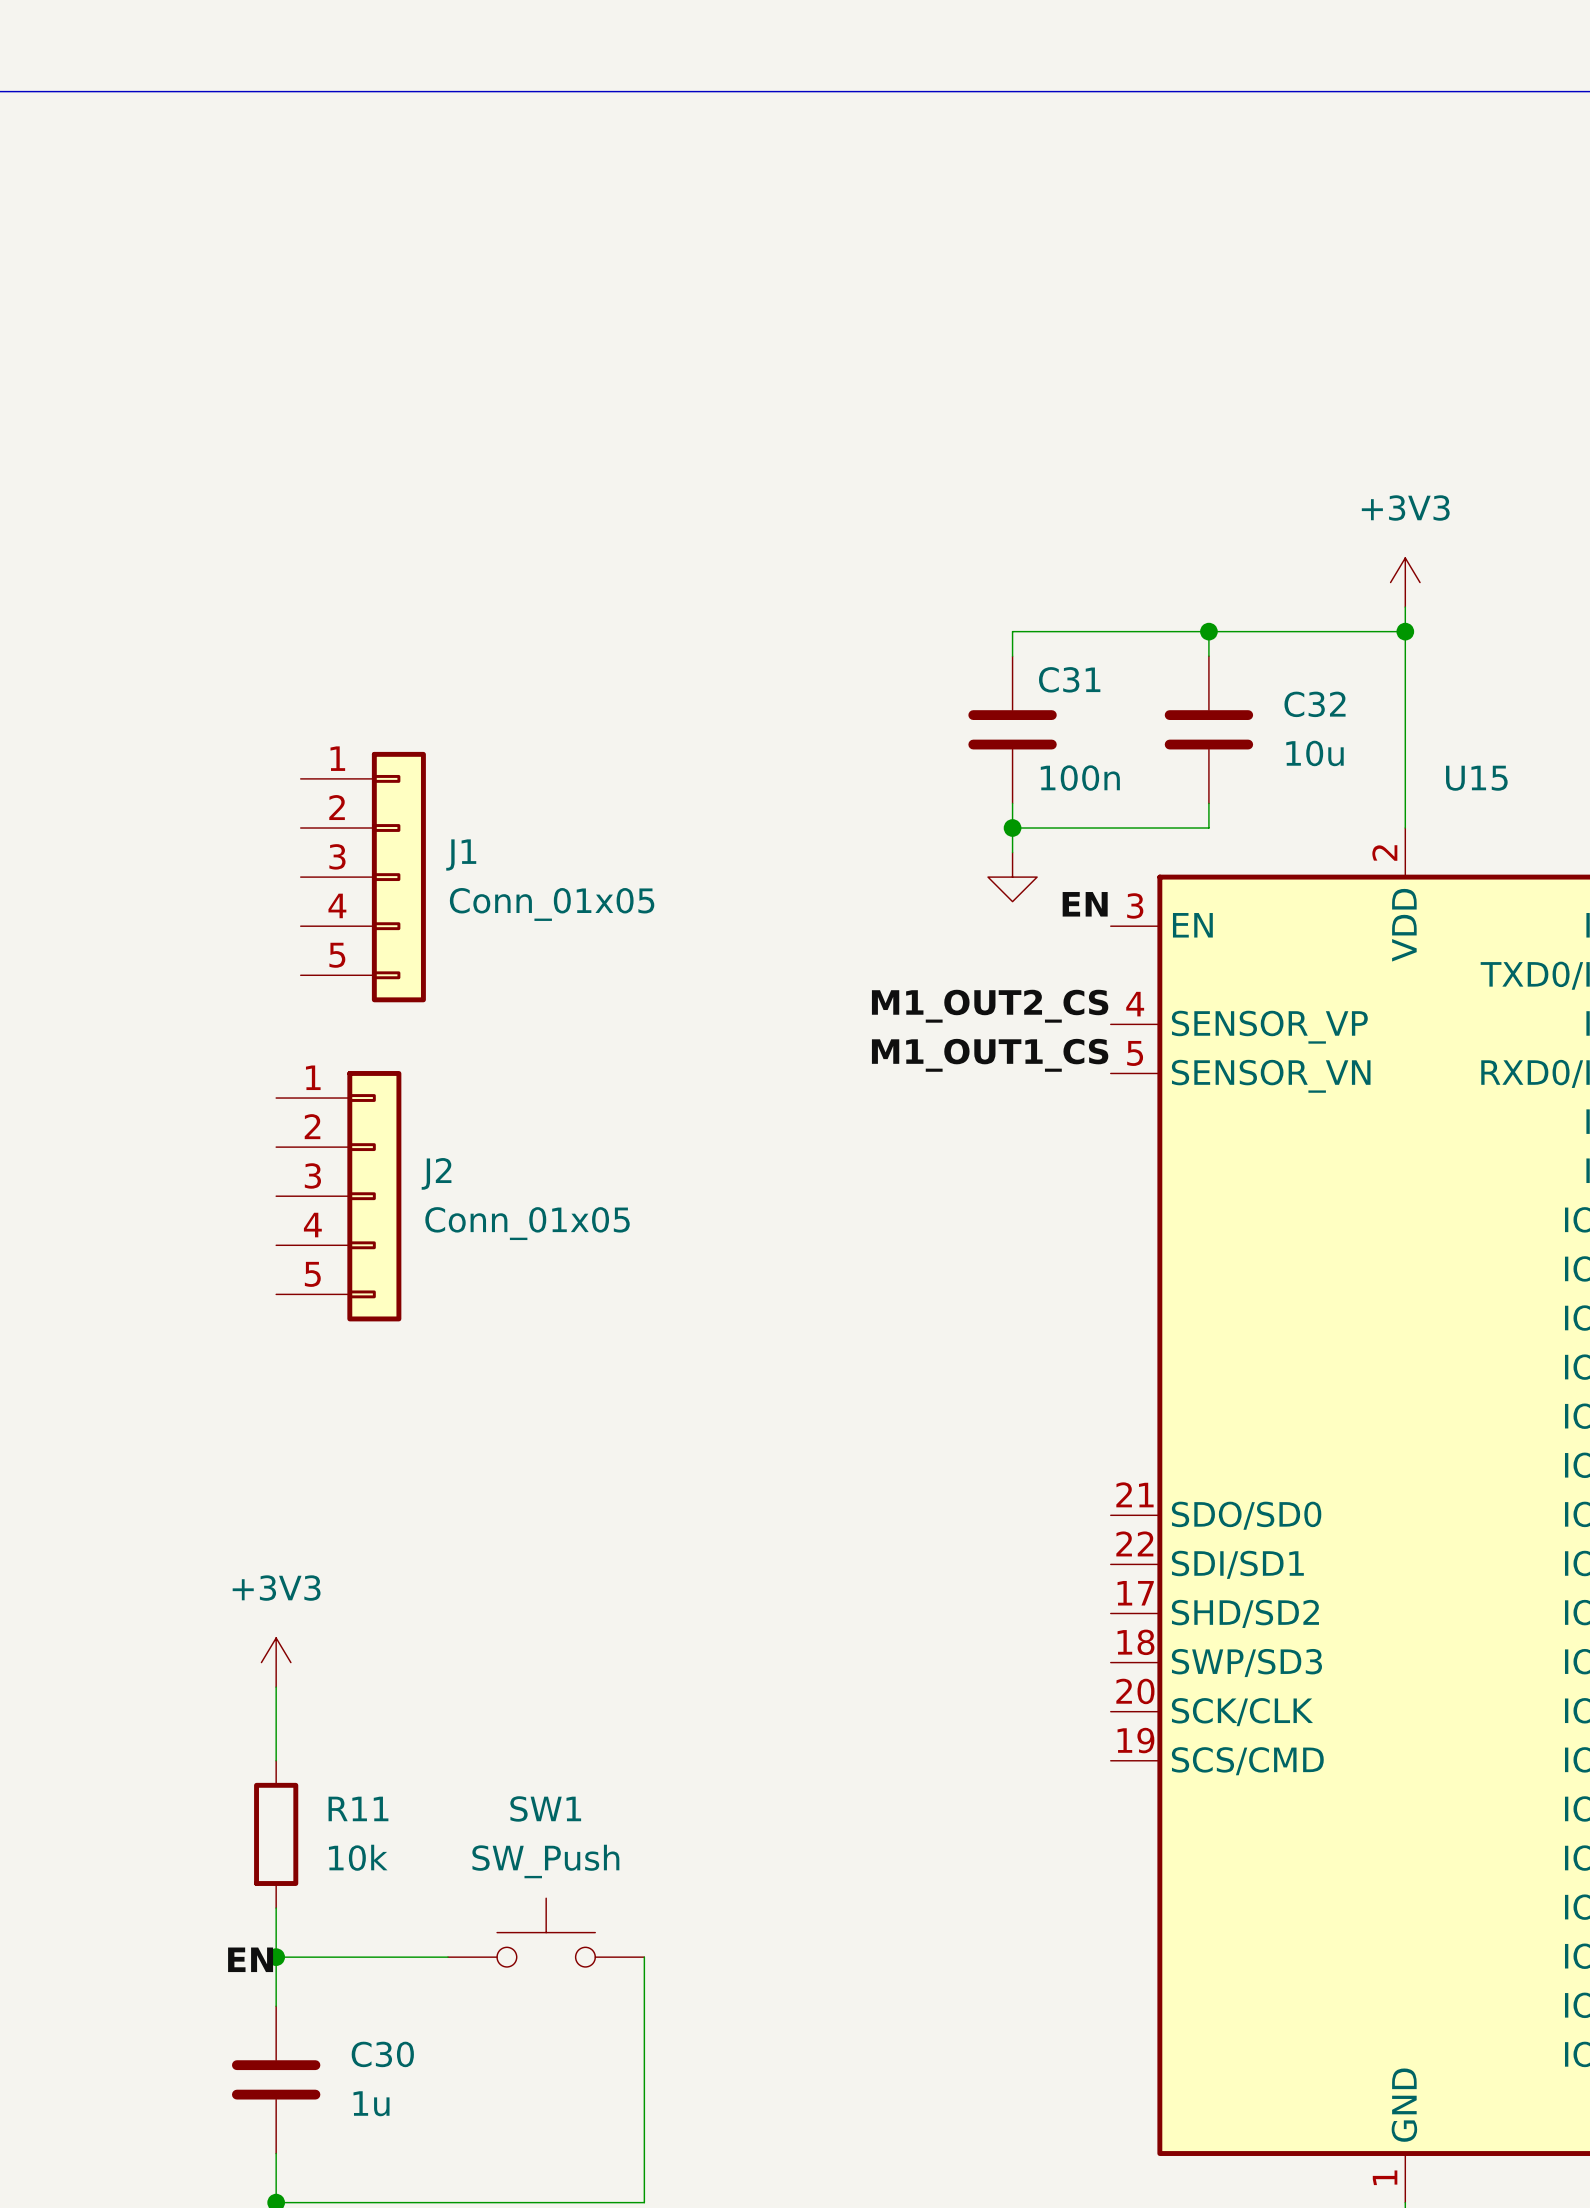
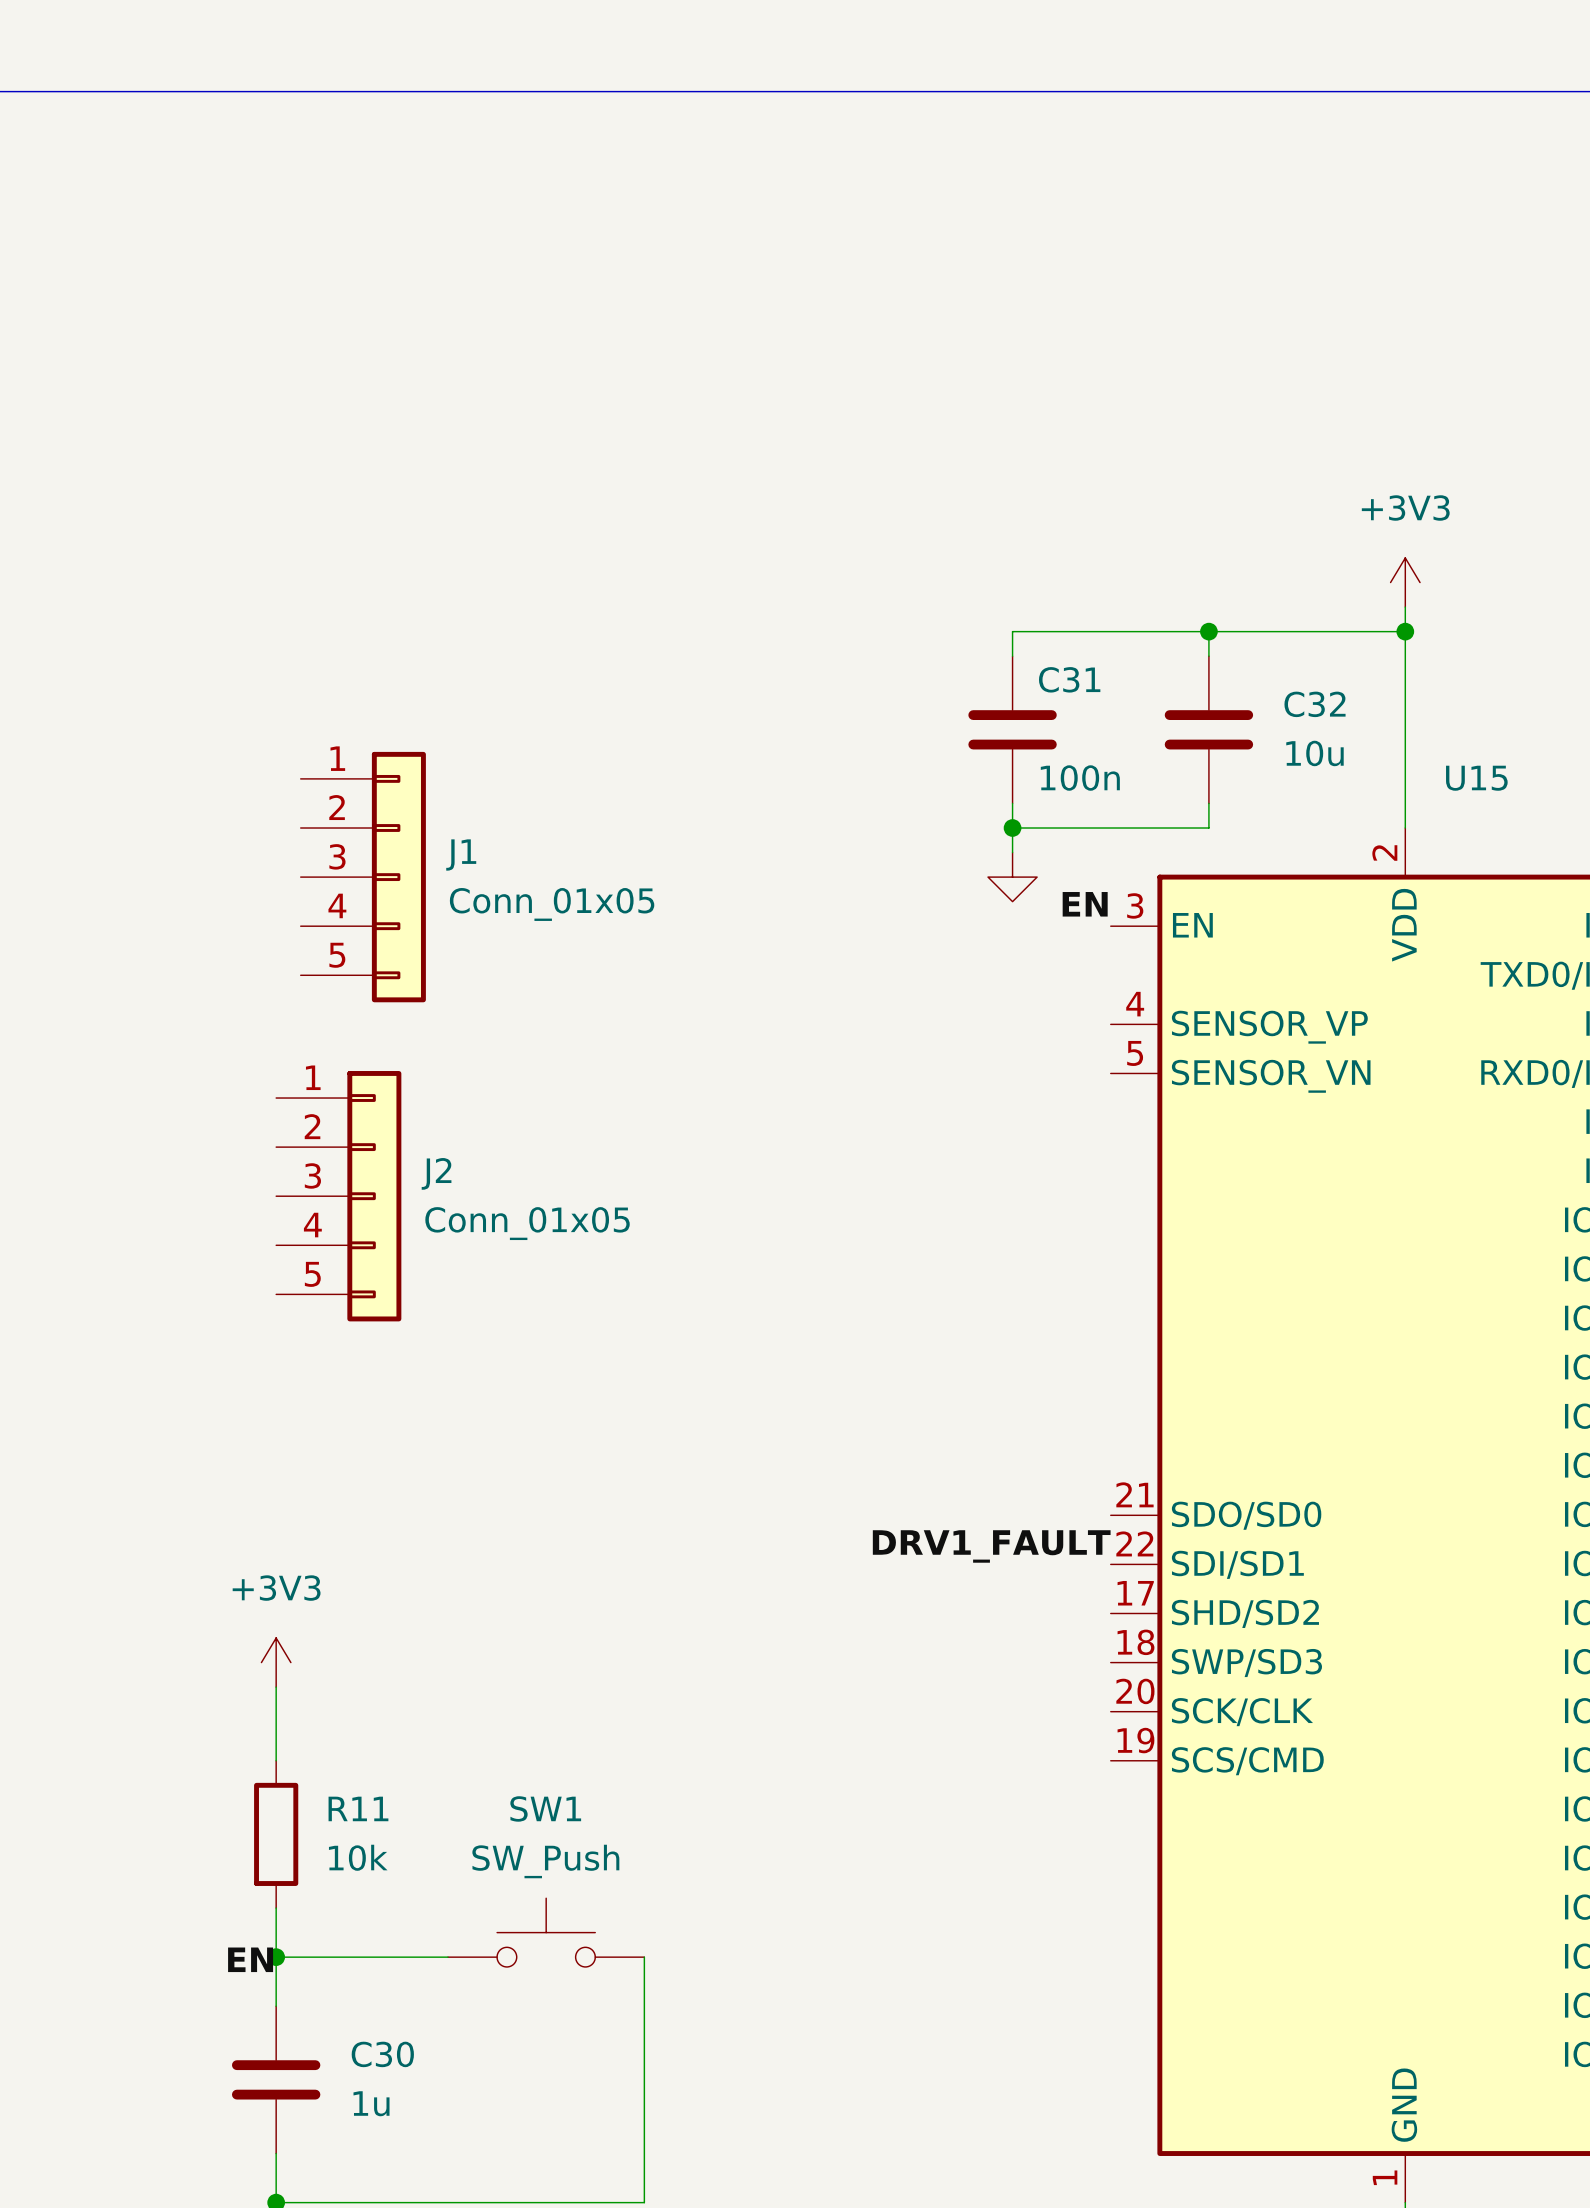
label: M1_OUT2_CS (990, 1006) -> none
label: M1_OUT1_CS (990, 1055) -> none
label: none -> DRV1_FAULT (991, 1546)

